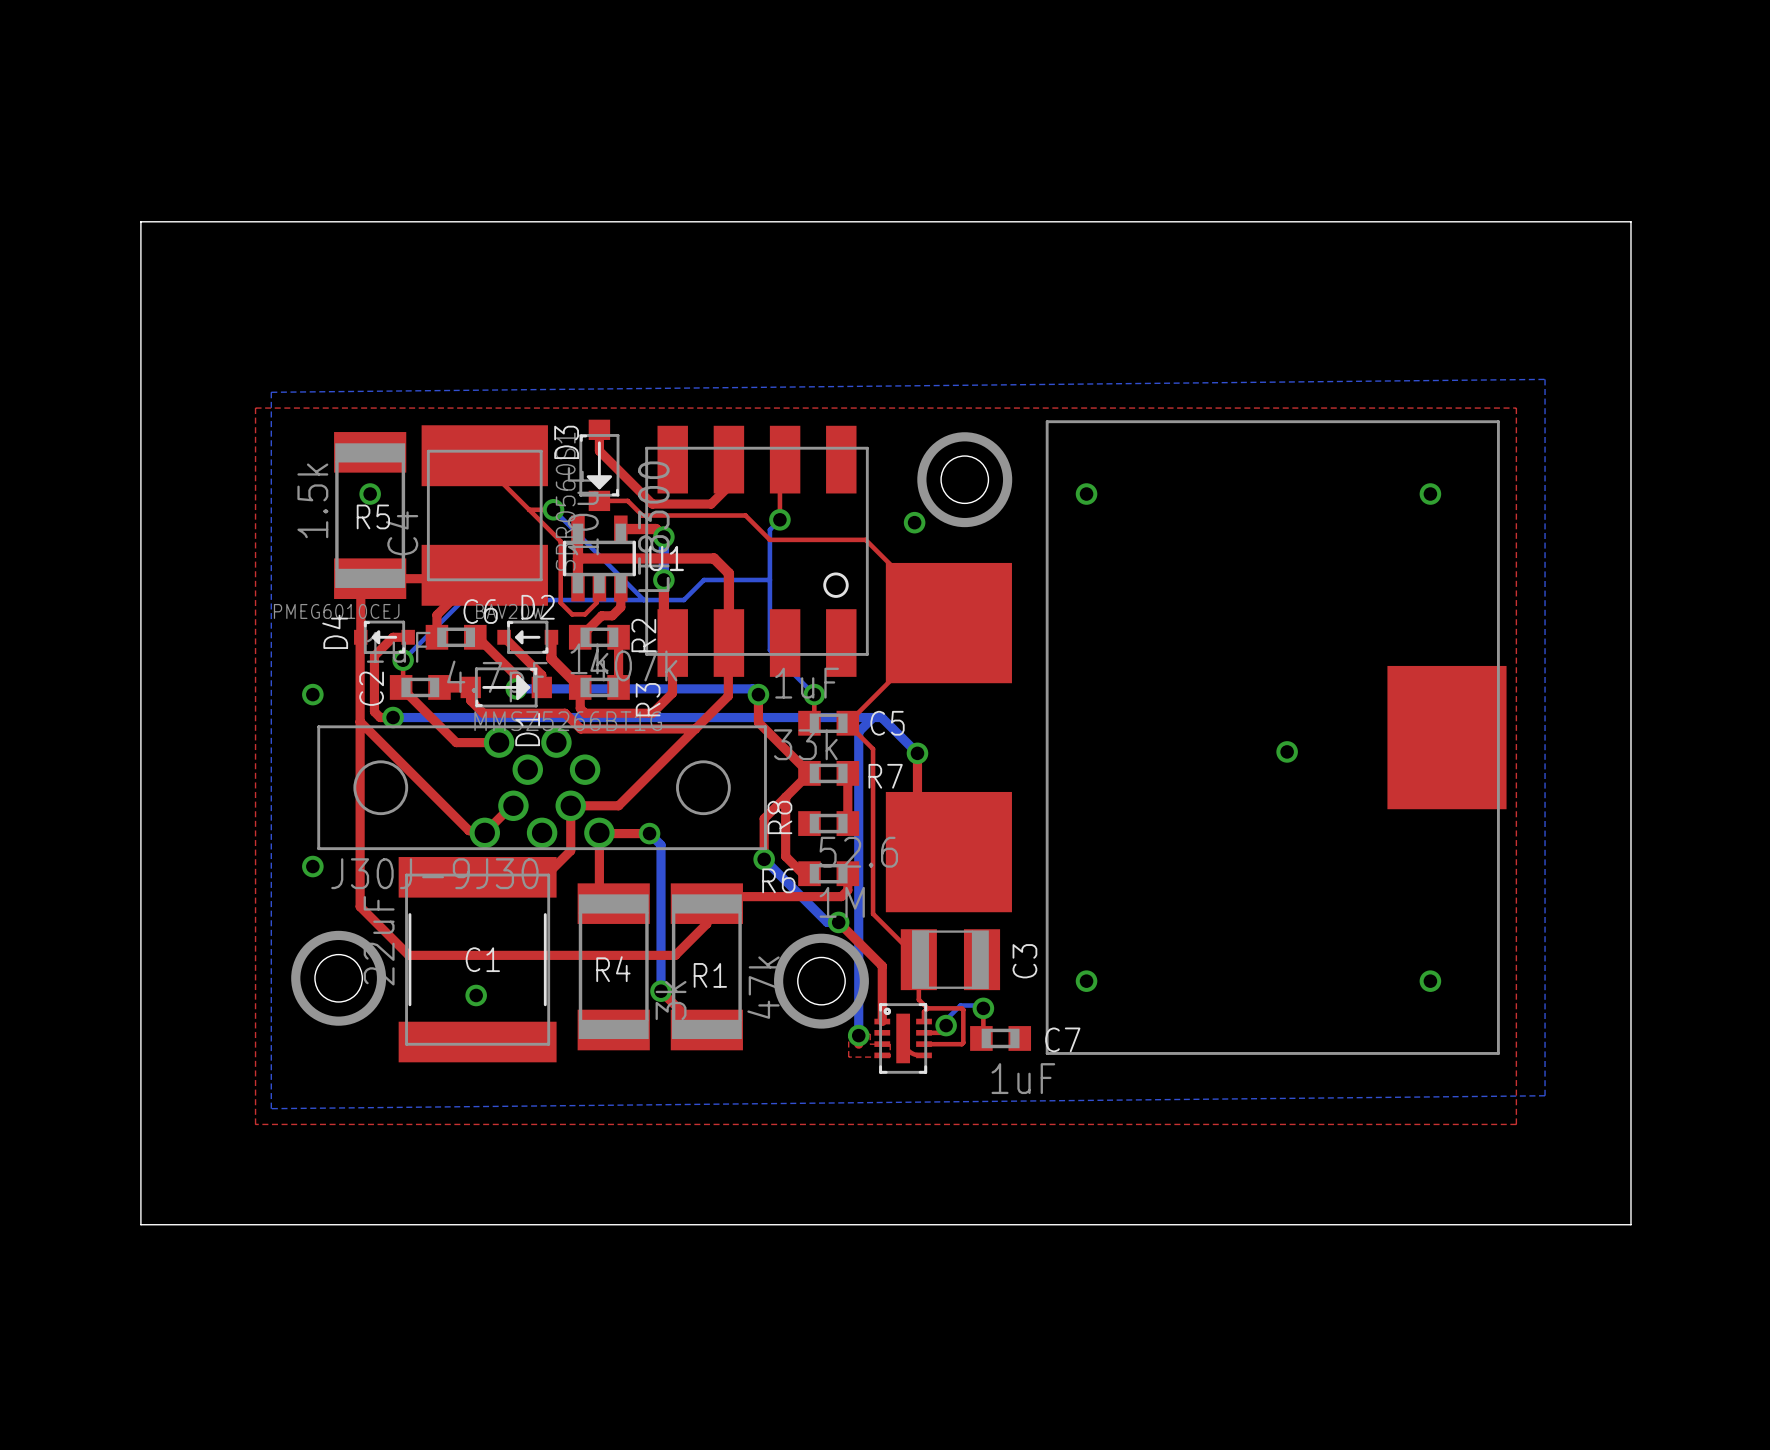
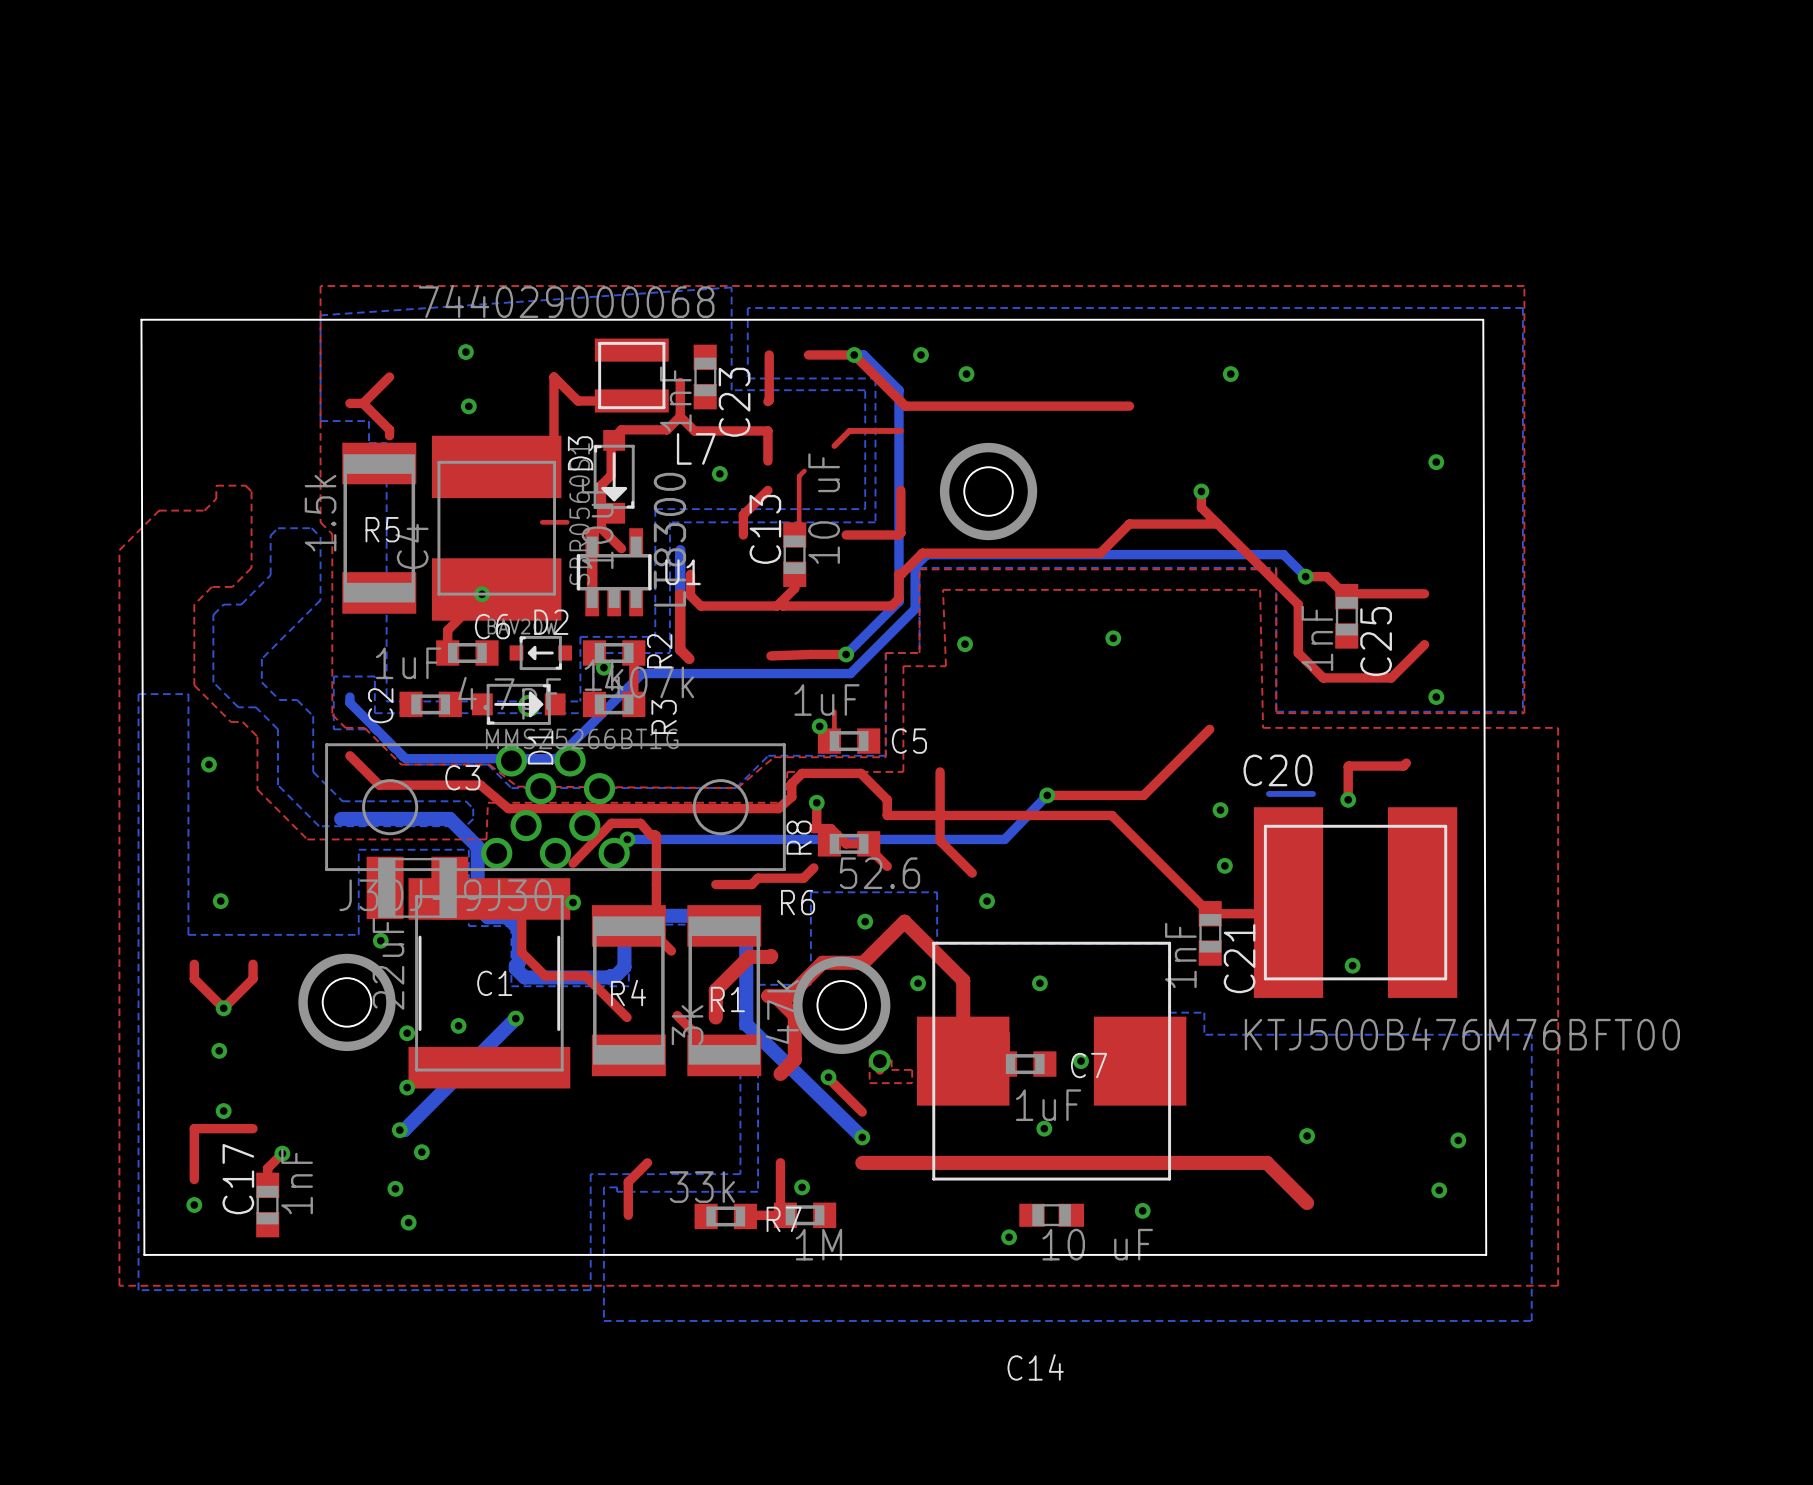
top zone outline: none -> (320, 285) (320, 522) (332, 534) (332, 714) (345, 727) (364, 727) (401, 764) (489, 764) (517, 786) (737, 788) (774, 757) (885, 757) (885, 653) (919, 653) (919, 569) (1276, 569) (1276, 713) (1524, 713) (1524, 285) (320, 285)
bottom zone outline: none -> (731, 287) (731, 390) (865, 390) (865, 509) (655, 509) (655, 636) (580, 636) (580, 701) (386, 701) (386, 443) (369, 443) (369, 421) (320, 421) (320, 315) (731, 287)
bottom zone outline: none -> (747, 308) (747, 378) (875, 378) (875, 522) (669, 522) (669, 653) (593, 653) (593, 713) (374, 713) (374, 676) (333, 676) (333, 729) (370, 729) (405, 764) (487, 764) (511, 788) (736, 788) (768, 755) (885, 755) (885, 653) (919, 653) (919, 567) (1276, 567) (1276, 711) (1522, 711) (1522, 308) (747, 308)
via: none -> (465, 352)
top track: none -> (769, 354) (767, 401)
top track: none -> (808, 354) (854, 354) (905, 406) (1129, 406)
bottom track: none -> (854, 354) (863, 354) (898, 390) (898, 601) (846, 654)
via: none -> (854, 354)
via: none -> (921, 354)
via: none -> (966, 374)
via: none -> (1230, 374)
L7: none -> 744029000068 (631, 375)
top track: none -> (389, 377) (363, 403)
C23: none -> 1nF (705, 377)
top track: none -> (680, 382) (680, 416)
top track: none -> (631, 400) (577, 400) (553, 377) (553, 435)
top track: none -> (349, 403) (363, 403)
top track: none -> (363, 403) (389, 429) (389, 435)
via: none -> (468, 406)
top track: none -> (680, 416) (667, 429) (621, 429) (611, 440) (611, 475) (601, 485) (601, 528) (621, 548)
top track: none -> (680, 416) (694, 430) (767, 430) (767, 461)
top zone outline: (255, 408) (1516, 408) (1516, 1124) (255, 1124) (255, 408) -> (216, 485) (216, 498) (204, 510) (159, 510) (119, 550) (119, 1285) (1558, 1285) (1558, 727) (1263, 727) (1260, 589) (943, 589) (945, 666) (903, 666) (903, 771) (787, 771) (785, 802) (487, 802) (486, 839) (307, 839) (257, 789) (257, 736) (242, 722) (231, 722) (194, 685) (194, 604) (211, 586) (232, 586) (251, 567) (251, 491) (245, 485) (216, 485)
top track: none -> (900, 430) (849, 430) (834, 446)
top track: (599, 429) (599, 451) (652, 504) (711, 504) (728, 486) (728, 459) -> none
via: none -> (1436, 462)
top track: (484, 455) (484, 465) (560, 541) (560, 602) (572, 614) (585, 614) (596, 602) (596, 590) (599, 587) -> none
via: none -> (719, 473)
top track: none -> (767, 490) (743, 514) (743, 534)
top track: none -> (900, 490) (900, 533) (898, 534) (846, 534)
top track: none -> (1201, 491) (1201, 507) (1298, 604) (1298, 653) (1323, 677) (1391, 677) (1424, 644)
via: none -> (1201, 491)
via: (370, 494) -> none
via: (1086, 494) -> none
via: (1430, 494) -> none
top track: (599, 500) (627, 500) (642, 515) (745, 515) (769, 539) (865, 539) (948, 623) (847, 723) (873, 749) (873, 913) (918, 959) (918, 999) (927, 1008) (963, 1009) (961, 1044) (924, 1044) -> none
bottom track: (553, 509) (643, 600) -> none
via: (553, 509) -> none
top track: none -> (1217, 524) (1129, 524) (1100, 553) (922, 553) (901, 574) (898, 574) (898, 598) (891, 606) (783, 606) (780, 603)
bottom track: (779, 519) (769, 529) (769, 650) (814, 694) -> none
via: (779, 519) -> none
via: (914, 522) -> none
top track: (620, 529) (655, 529) (663, 537) -> none
via: (663, 537) -> none
C13: none -> 10 uF (794, 554)
part: (757, 551) -> none
top track: (577, 558) (714, 558) (728, 573) (728, 696) (618, 805) (570, 805) (570, 850) (544, 877) (477, 877) -> none
top track: none -> (690, 574) (690, 595) (700, 606) (777, 606) (794, 588) (794, 574)
top track: none -> (1305, 576) (1326, 576) (1346, 596) (1349, 593) (1424, 593)
bottom track: none -> (1305, 576) (1283, 554) (926, 554) (915, 566) (915, 608) (850, 673) (642, 673) (556, 758) (405, 758) (349, 702) (349, 697)
via: none -> (1305, 576)
top track: (484, 575) (481, 578) (370, 578) (360, 588) (360, 906) (408, 955) (675, 955) (706, 923) (706, 899) -> none
via: none -> (482, 594)
via: (663, 579) -> none
bottom track: (769, 579) (703, 579) (683, 600) (463, 600) (403, 660) -> none
top track: (620, 587) (620, 607) (612, 615) (601, 615) (580, 637) -> none
C25: none -> 1nF (1346, 616)
via: none -> (1113, 638)
via: none -> (965, 644)
D4: PMEG6010CEJ (384, 637) -> none
top track: (408, 637) (393, 637) (374, 655) (374, 711) (380, 717) (393, 717) -> none
top track: (475, 637) (477, 637) (516, 675) (516, 688) -> none
top track: (504, 637) (541, 675) (541, 687) -> none
top track: (551, 637) (551, 658) (580, 687) (580, 708) (585, 713) (652, 713) (672, 693) (672, 643) -> none
top track: none -> (846, 654) (770, 655)
via: none -> (846, 654)
via: none -> (603, 667)
top track: (403, 660) (403, 685) (401, 687) (456, 742) (499, 742) -> none
via: (403, 660) -> none
bottom zone outline: none -> (138, 694) (188, 694) (188, 934) (358, 934) (358, 849) (468, 849) (468, 926) (511, 926) (511, 986) (628, 986) (628, 924) (740, 924) (740, 1174) (590, 1174) (590, 1290) (138, 1290) (138, 694)
via: none -> (1436, 697)
top track: (439, 687) (470, 687) (470, 700) (483, 713) (565, 713) (580, 728) (695, 728) -> none
bottom track: (516, 688) (752, 688) (758, 694) -> none
via: (312, 694) -> none
top track: (758, 694) (758, 722) (809, 773) (764, 818) (764, 859) -> none
via: (758, 694) -> none
via position: (814, 694) -> (819, 726)
bottom zone outline: (271, 711) (271, 392) (1545, 379) (1545, 1095) (271, 1108) (271, 766) -> (277, 729) (255, 707) (238, 707) (213, 682) (213, 614) (223, 604) (241, 604) (270, 575) (270, 535) (277, 528) (311, 528) (320, 537) (320, 600) (261, 658) (261, 682) (279, 699) (297, 699) (313, 716) (313, 771) (342, 801) (465, 801) (473, 808) (473, 818) (465, 826) (319, 826) (277, 785)
top track: none -> (1209, 729) (1143, 795) (1047, 795)
bottom track: (393, 717) (881, 717) (917, 753) -> none
via: (393, 717) -> none
bottom track: (873, 717) (858, 731) (858, 1035) -> none
top track: (360, 721) (469, 830) (482, 830) (484, 832) (513, 805) -> none
top track: none -> (349, 755) (379, 785) (480, 785) (508, 808) (778, 808) (791, 796) (791, 783) (802, 773) (860, 773) (887, 799) (887, 815) (1111, 815) (1210, 913) (1277, 913) (1288, 902)
part: (1196, 737) -> none
top track: none -> (1406, 763) (1403, 766) (1348, 766) (1348, 799)
via: none -> (208, 764)
via: (1287, 751) -> none
via: (917, 753) -> none
R7 position: (828, 773) -> (725, 1216)
top track: (847, 773) (847, 823) -> none
bottom track: none -> (1268, 793) (1312, 793)
bottom track: none -> (1047, 795) (1004, 839) (627, 839)
via: none -> (1047, 795)
via: none -> (1348, 799)
top track: none -> (816, 802) (816, 825) (813, 828) (830, 828) (846, 843) (864, 843) (887, 866)
via: none -> (816, 802)
via: none -> (1220, 810)
top track: (785, 797) (785, 856) (802, 873) (809, 873) -> none
bottom track: none -> (341, 818) (449, 818) (477, 846) (477, 906) (487, 917) (507, 917) (518, 929) (518, 962) (515, 968) (524, 977) (615, 975) (624, 967) (624, 915) (743, 915) (746, 918) (746, 1024) (862, 1137)
via: none -> (627, 839)
top track: (649, 833) (599, 832) (599, 889) (613, 903) -> none
bottom track: (649, 833) (661, 845) (661, 991) -> none
via: (649, 833) -> none
top track: none -> (573, 863) (611, 823) (640, 823) (650, 835) (655, 835) (656, 936) (671, 951)
via: none -> (1224, 865)
top track: none -> (813, 867) (803, 878) (758, 878) (751, 884) (715, 884)
bottom track: (764, 859) (827, 922) (838, 922) -> none
via: (764, 859) -> none
via: (312, 866) -> none
bottom zone outline: none -> (810, 892) (937, 892) (937, 943) (1169, 943) (1169, 1012) (1204, 1012) (1204, 1034) (1531, 1034) (1531, 1320) (603, 1320) (603, 1187) (617, 1187) (617, 1191) (758, 1191) (758, 984) (810, 984) (810, 892)
R6 position: (828, 873) -> (805, 1215)
top track: (847, 873) (847, 890) (841, 896) (713, 896) (706, 903) -> none
top track: none -> (507, 900) (521, 912) (521, 952) (545, 975) (585, 975) (627, 1017)
via: none -> (220, 901)
via: none -> (987, 901)
via: none -> (573, 902)
C20: none -> KTJ500B476M76BFT00 (1355, 902)
via: none -> (865, 921)
C21: none -> 1nF (1210, 933)
via: none -> (380, 940)
top track: (838, 922) (882, 966) (882, 1021) -> none
via: (838, 922) -> none
top track: none -> (771, 955) (749, 956) (715, 990) (715, 1017)
top track: none -> (194, 964) (194, 978) (223, 1008) (253, 978) (253, 964)
via: none -> (1352, 965)
via: none -> (918, 983)
C3 position: (950, 959) -> (417, 887)
via: none -> (1039, 983)
C3 name rotation: 0° (1024, 961) -> 90° clockwise (462, 777)
C3 name position: C3 (1024, 961) -> C3 (462, 777)
top track: none -> (768, 995) (789, 995) (822, 962) (863, 962) (904, 921) (963, 980) (963, 1061)
top track: none -> (775, 995) (794, 1015) (794, 1059) (780, 1073)
via: (1086, 981) -> none
via: (1430, 981) -> none
via: none -> (223, 1008)
via: (661, 991) -> none
bottom track: none -> (515, 1018) (404, 1130) (399, 1130)
via: none -> (515, 1018)
via: (476, 995) -> none
via: none -> (458, 1025)
via: none -> (407, 1033)
bottom track: (983, 1008) (980, 1005) (960, 1005) (946, 1019) (946, 1025) -> none
via: (983, 1008) -> none
via: none -> (219, 1050)
via: (946, 1025) -> none
part: none -> (1051, 1061)
via: none -> (1081, 1061)
part: (903, 1038) -> none
top track: none -> (828, 1077) (862, 1112)
via: none -> (828, 1077)
via: none -> (407, 1087)
via: none -> (223, 1111)
top track: none -> (253, 1128) (194, 1128) (194, 1179)
via: none -> (1044, 1128)
via: none -> (399, 1130)
via: none -> (1307, 1136)
via: none -> (862, 1137)
via: none -> (1458, 1140)
via: none -> (421, 1152)
top track: none -> (282, 1153) (267, 1168) (267, 1185)
via: none -> (282, 1153)
top track: none -> (647, 1162) (628, 1182) (628, 1215)
top track: none -> (780, 1162) (780, 1210) (785, 1215) (745, 1216)
top track: none -> (862, 1162) (1266, 1162) (1307, 1203)
via: none -> (802, 1187)
via: none -> (395, 1188)
via: none -> (1439, 1190)
via: none -> (194, 1205)
C17: none -> 1nF (267, 1205)
via: none -> (1142, 1210)
C14: none -> 10 uF (1051, 1215)
via: none -> (408, 1222)
via: none -> (1009, 1237)
board edge: (140, 1224) (140, 221) (1630, 221) (1630, 1224) (1450, 1224) -> (144, 1254) (141, 319) (1483, 319) (1486, 1254)

